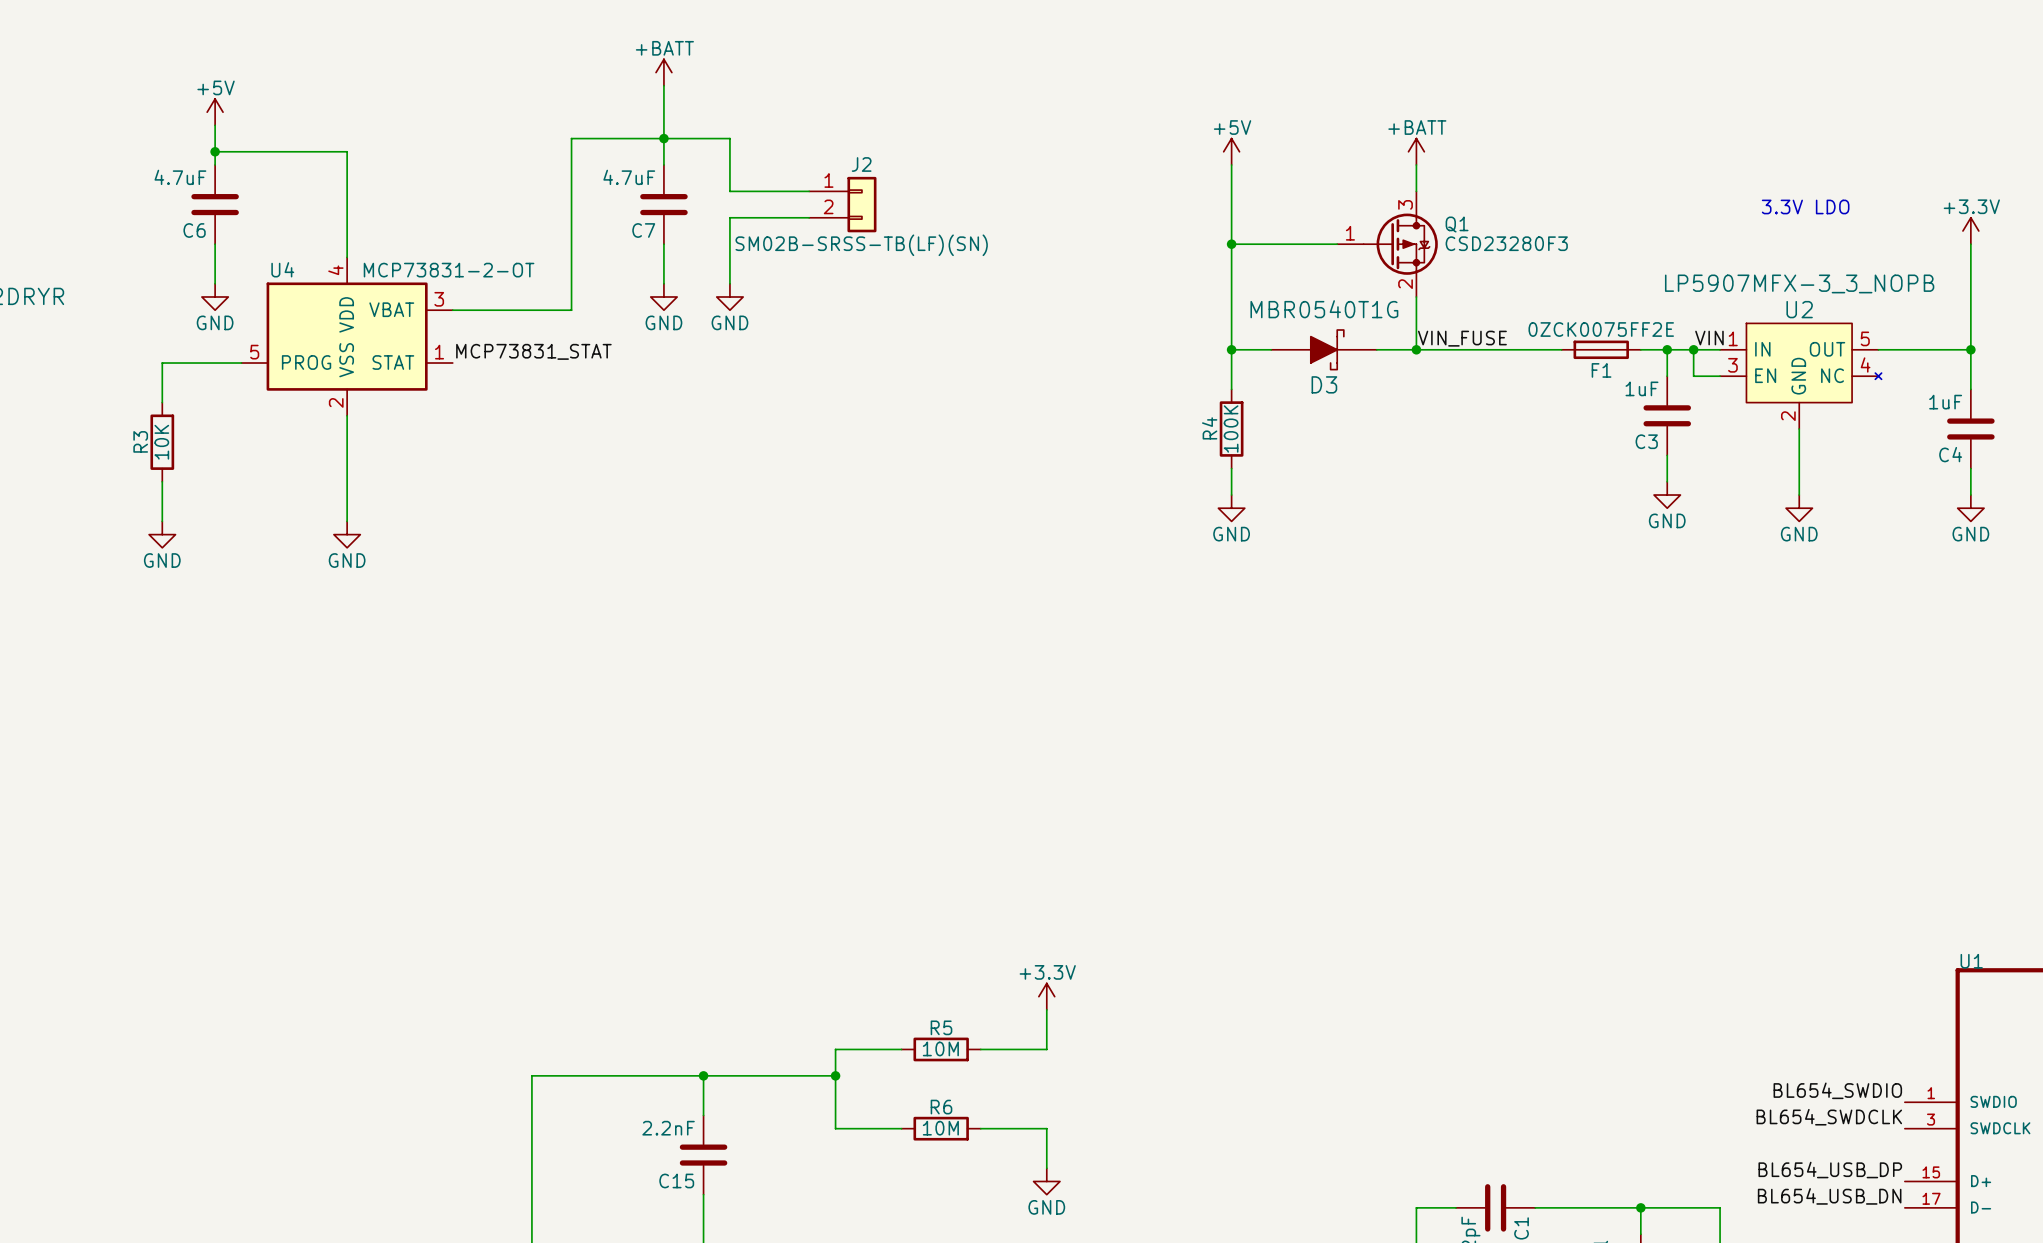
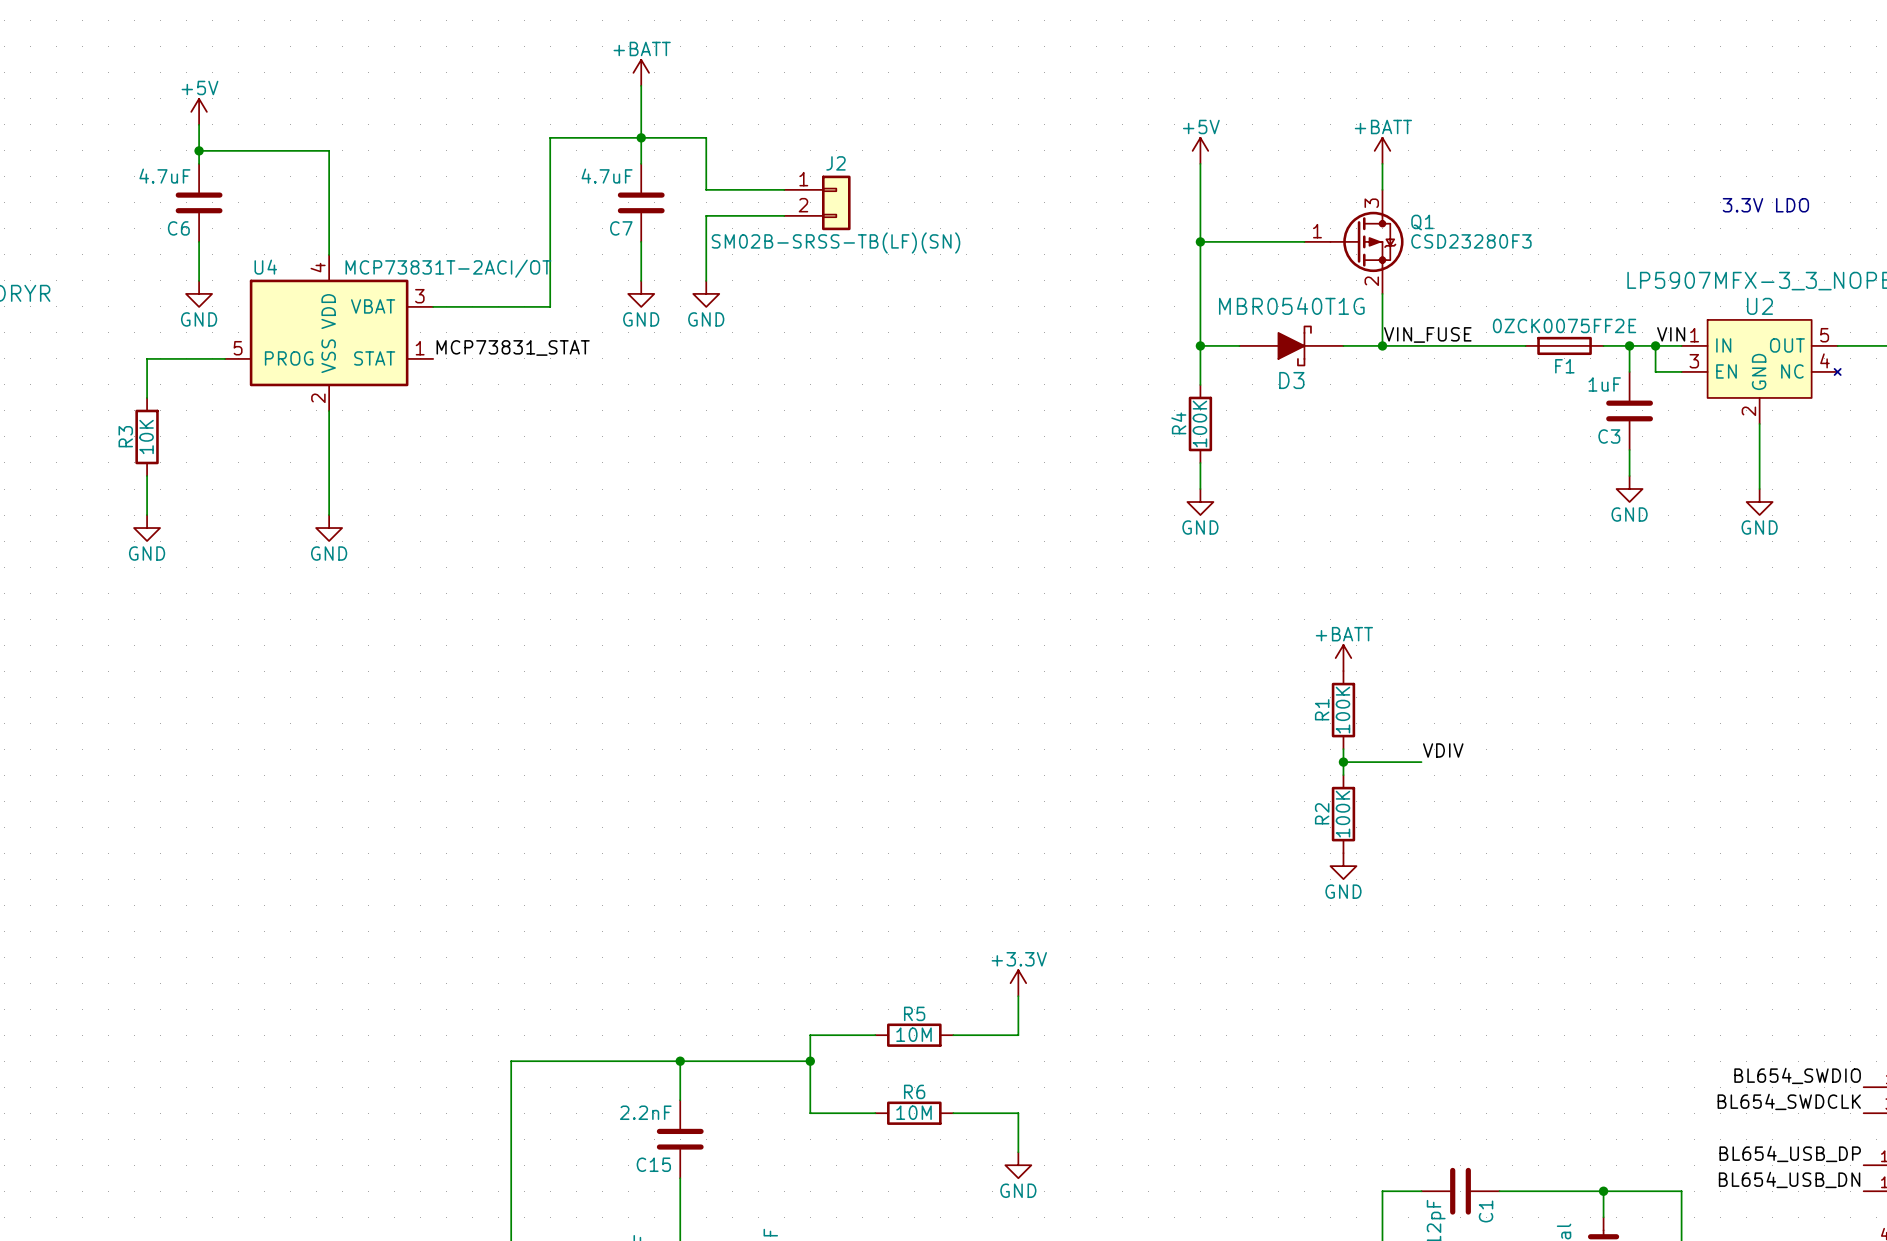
U4 value: MCP73831-2-OT (449, 270) -> MCP73831T-2ACI/OT (448, 268)
power symbol: none -> +BATT (1343, 658)
R1: none -> 100K (1343, 710)
wire: none -> (1343, 749) (1343, 775)
label: none -> VDIV (1443, 750)
wire: none -> (1343, 762) (1421, 762)
junction: none -> (1343, 762)
R2: none -> 100K (1343, 814)
power symbol: none -> GND (1343, 866)

